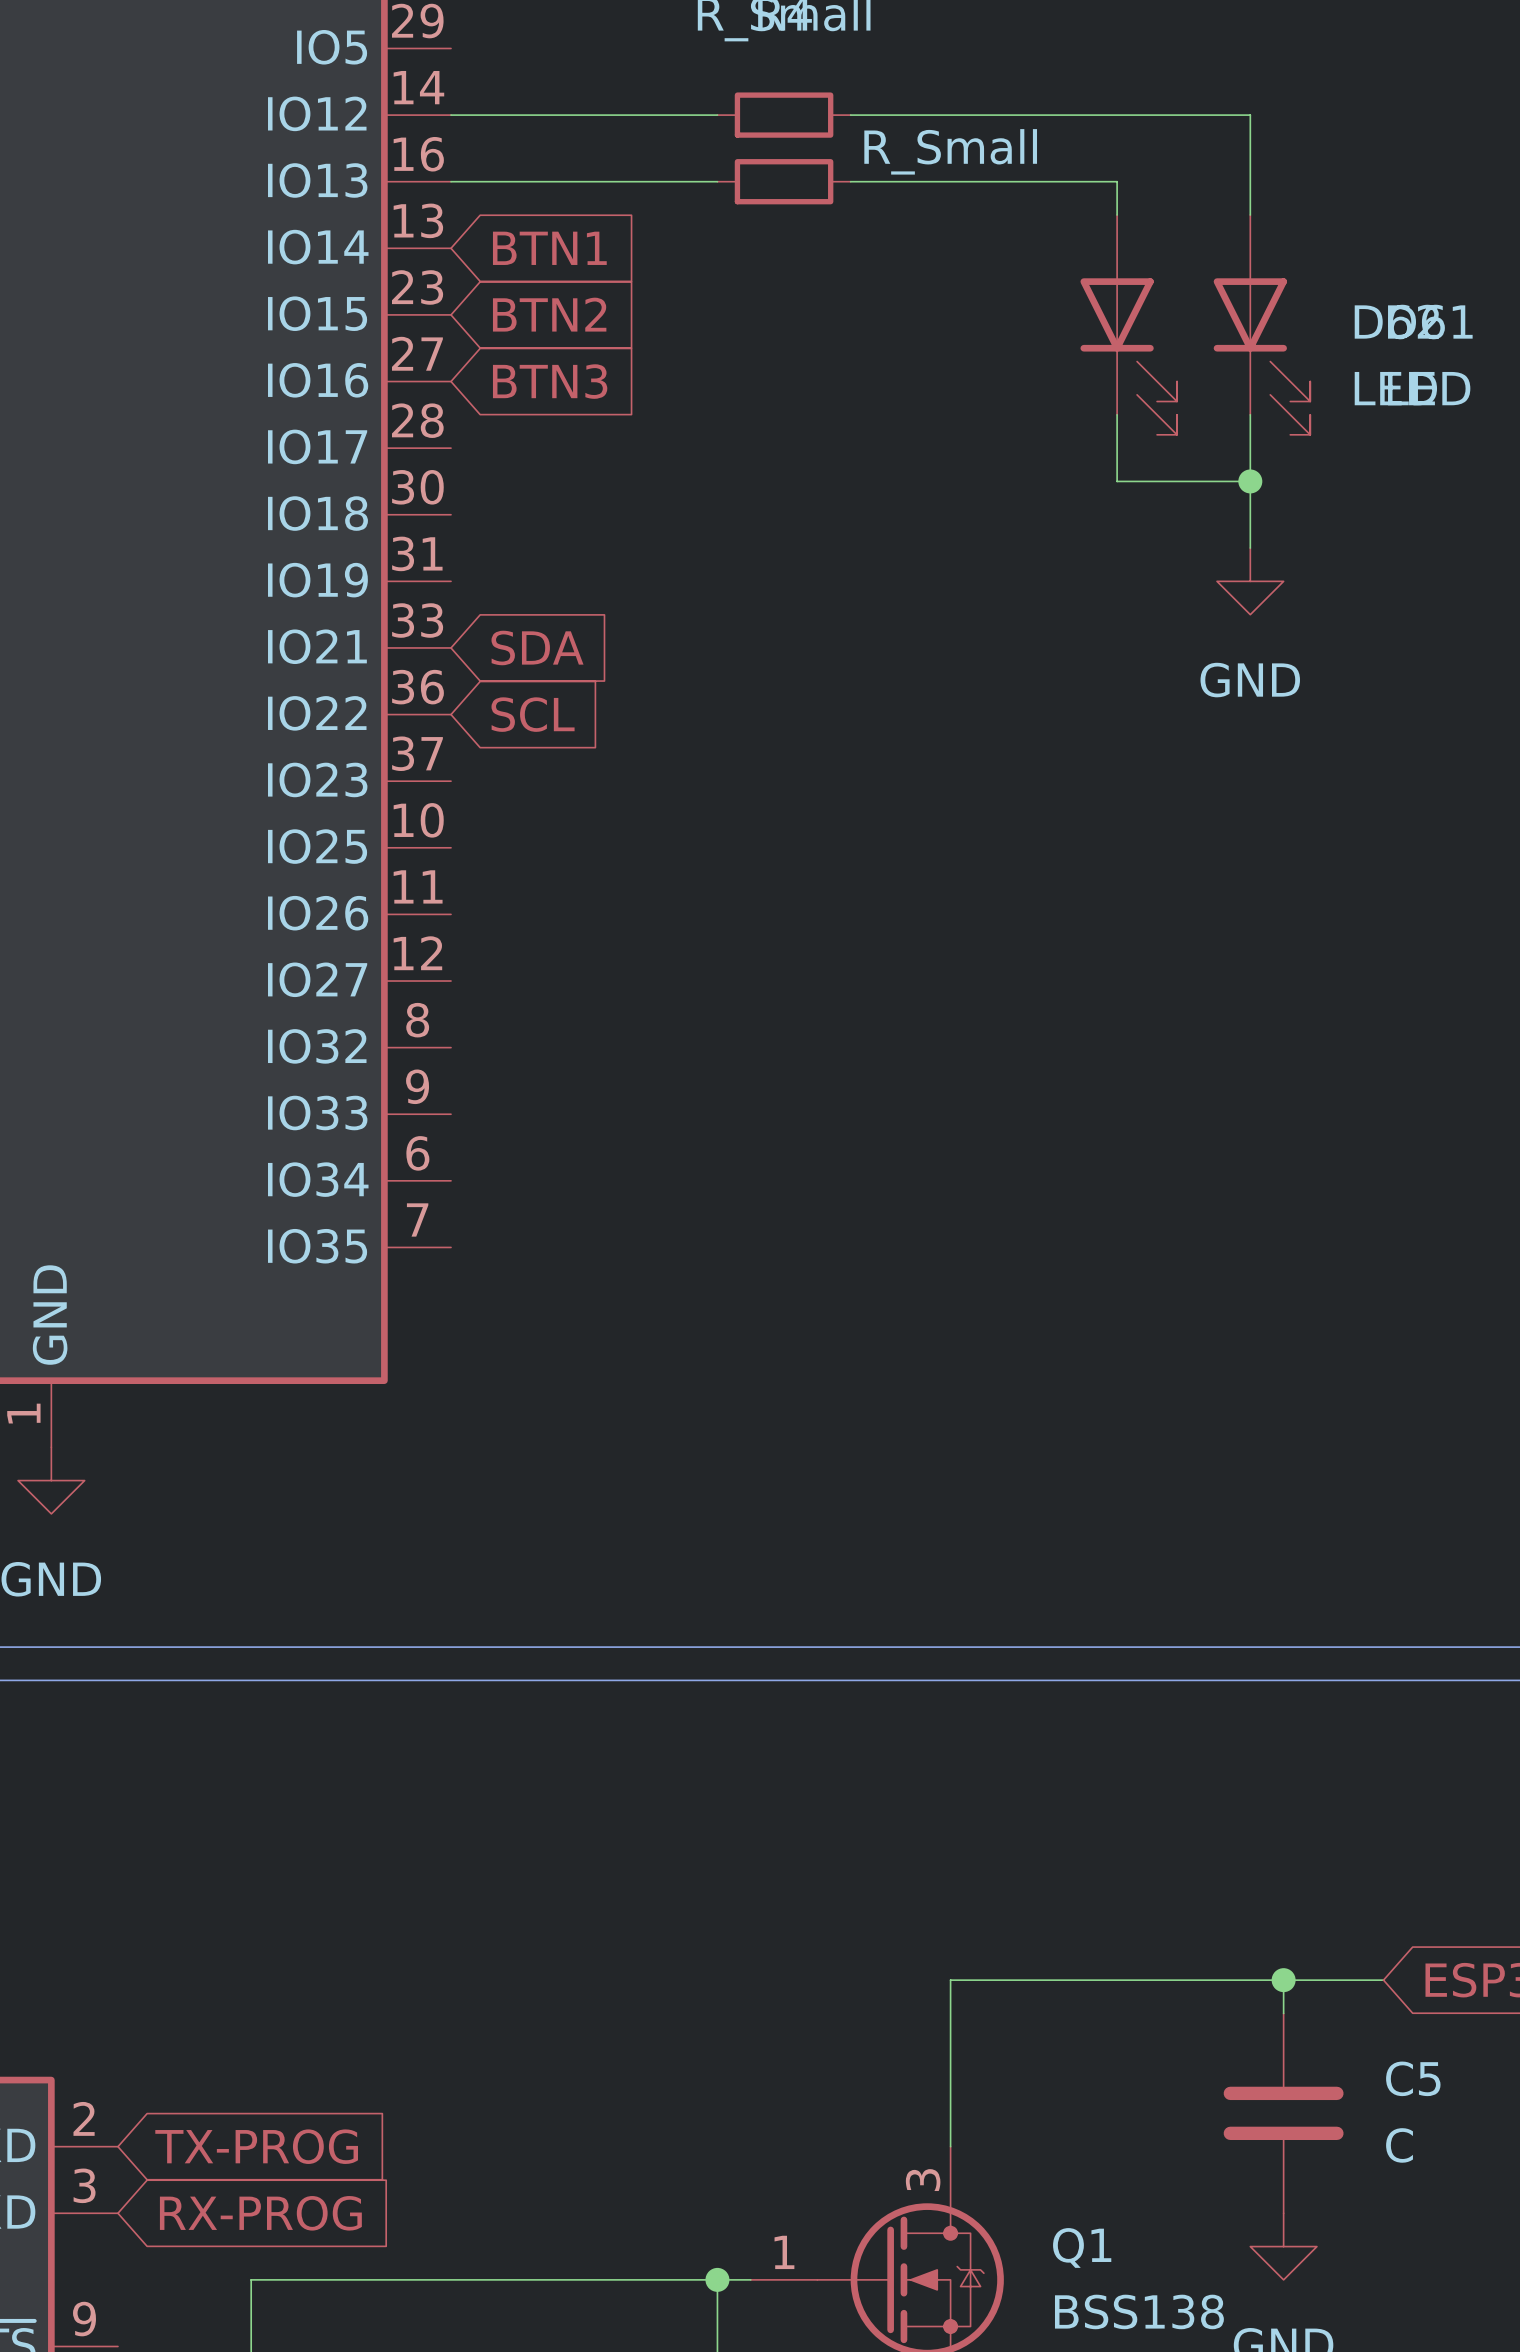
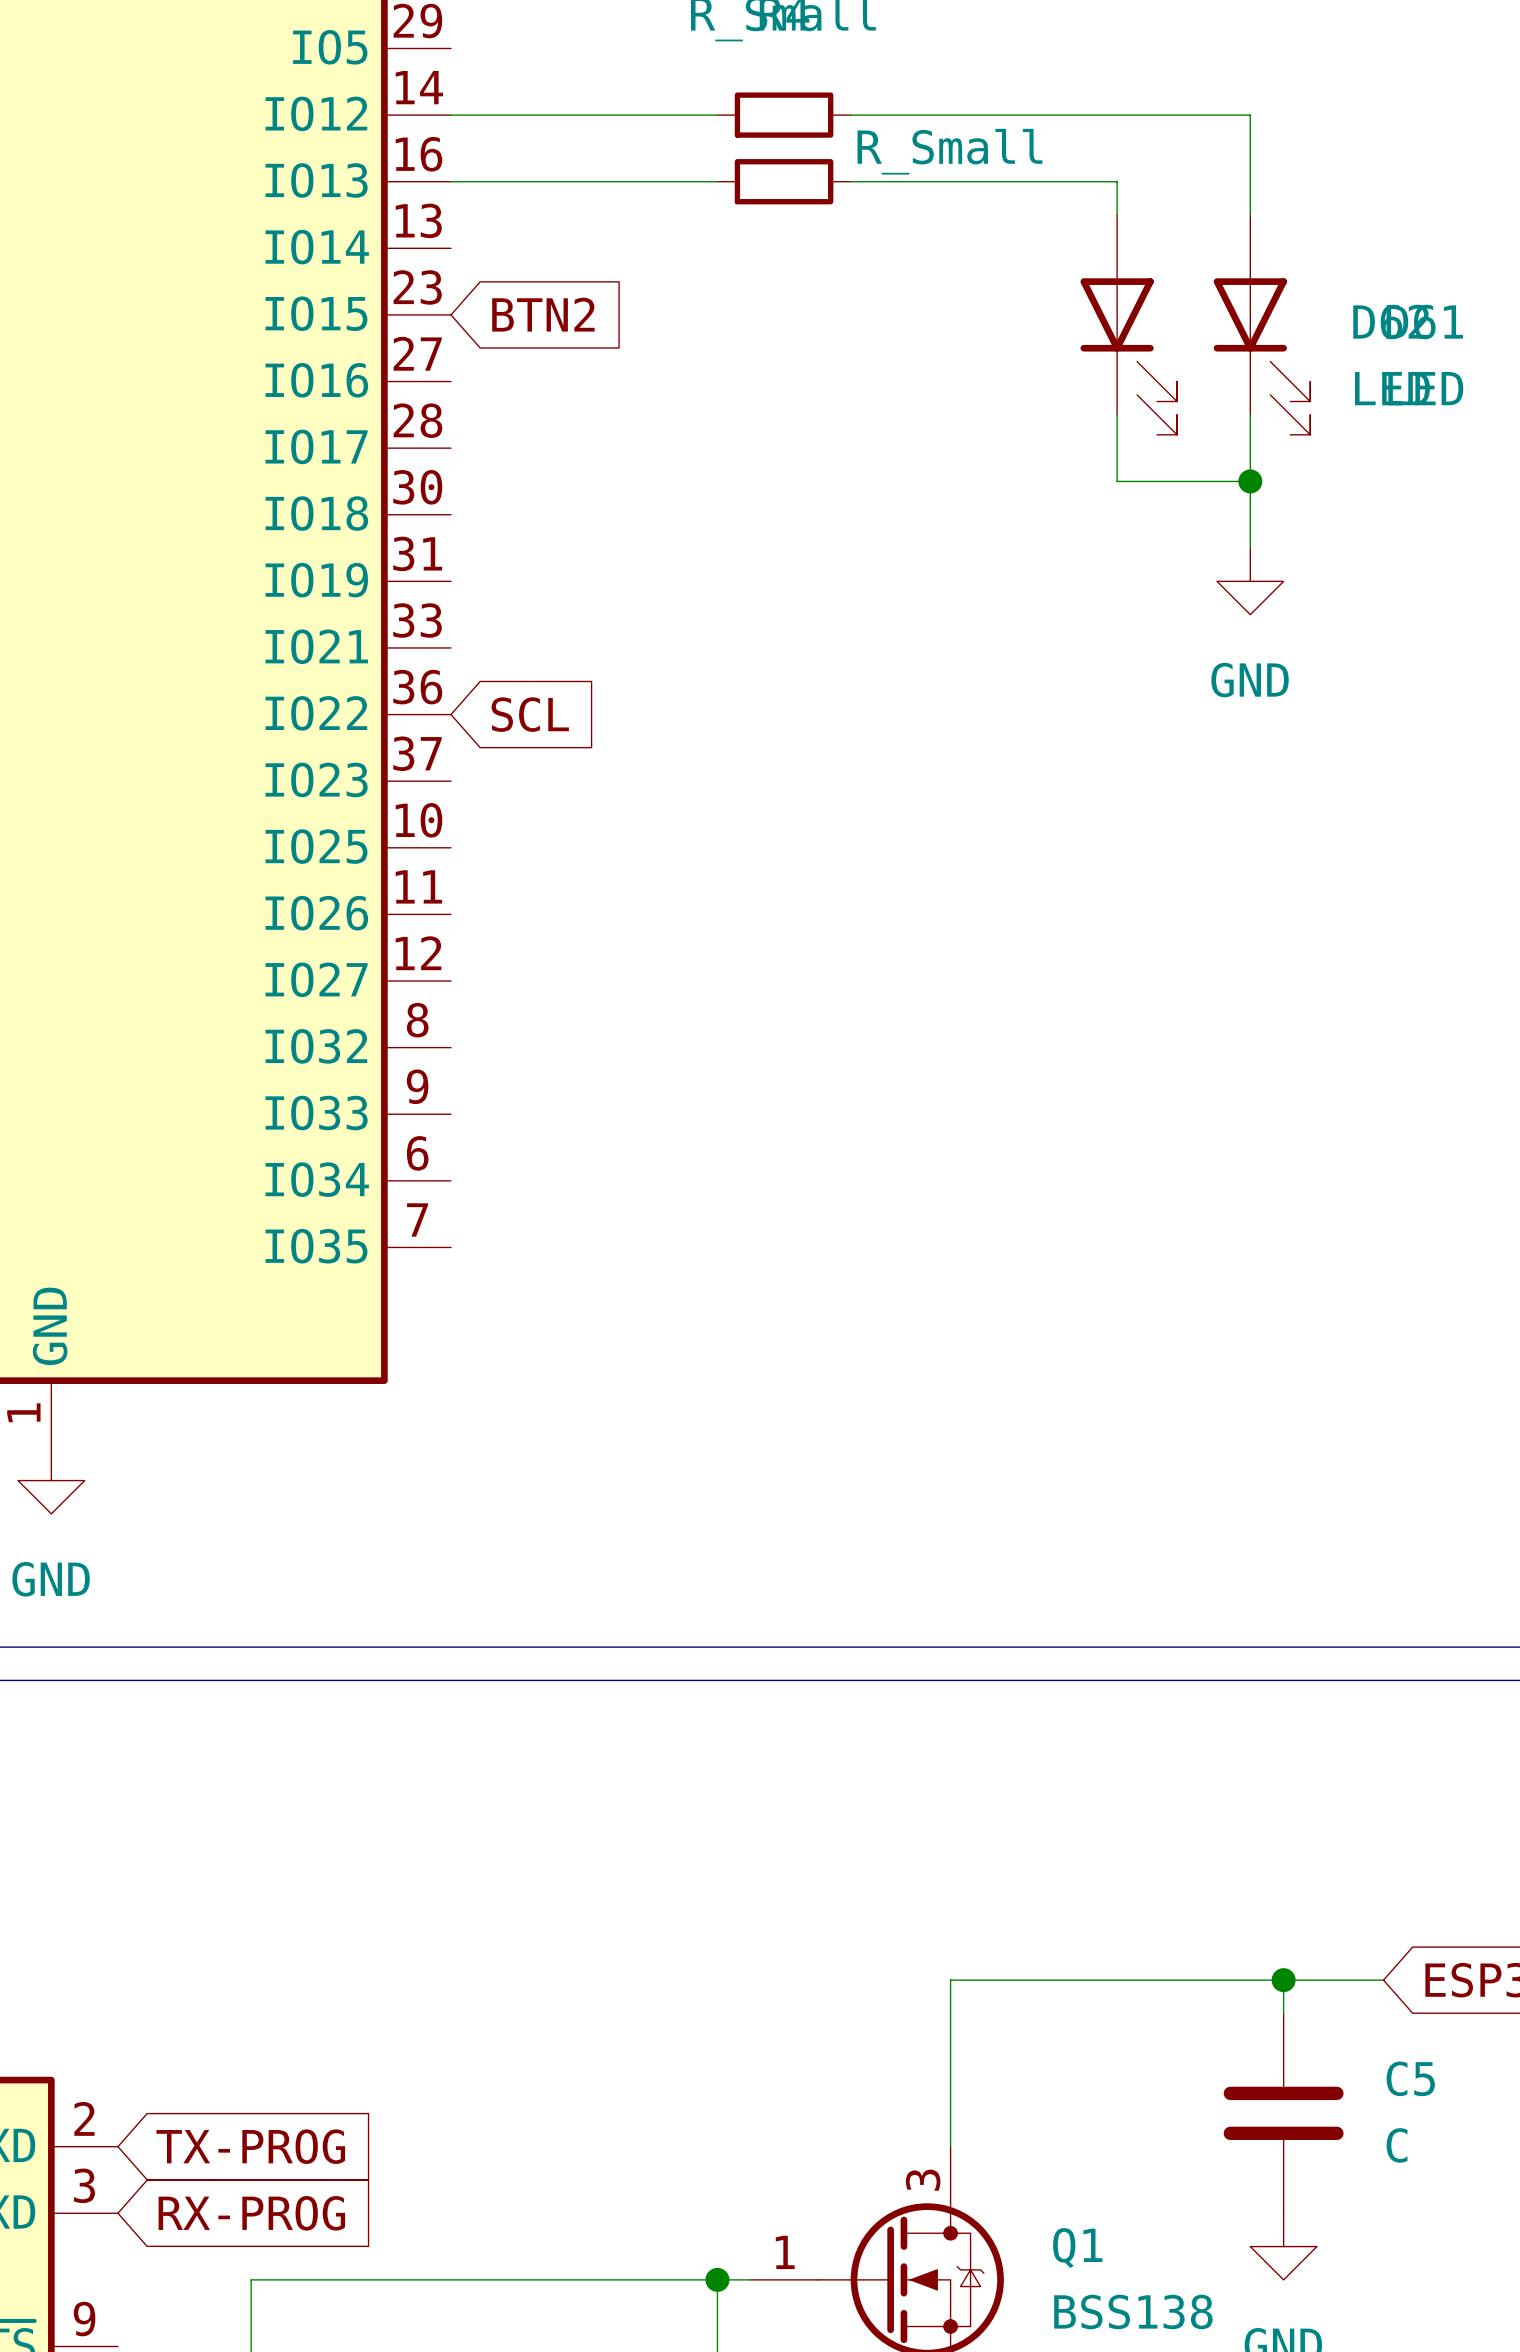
global label: BTN1 (549, 248) -> none
global label: BTN3 (550, 381) -> none
global label: SDA (537, 647) -> none

